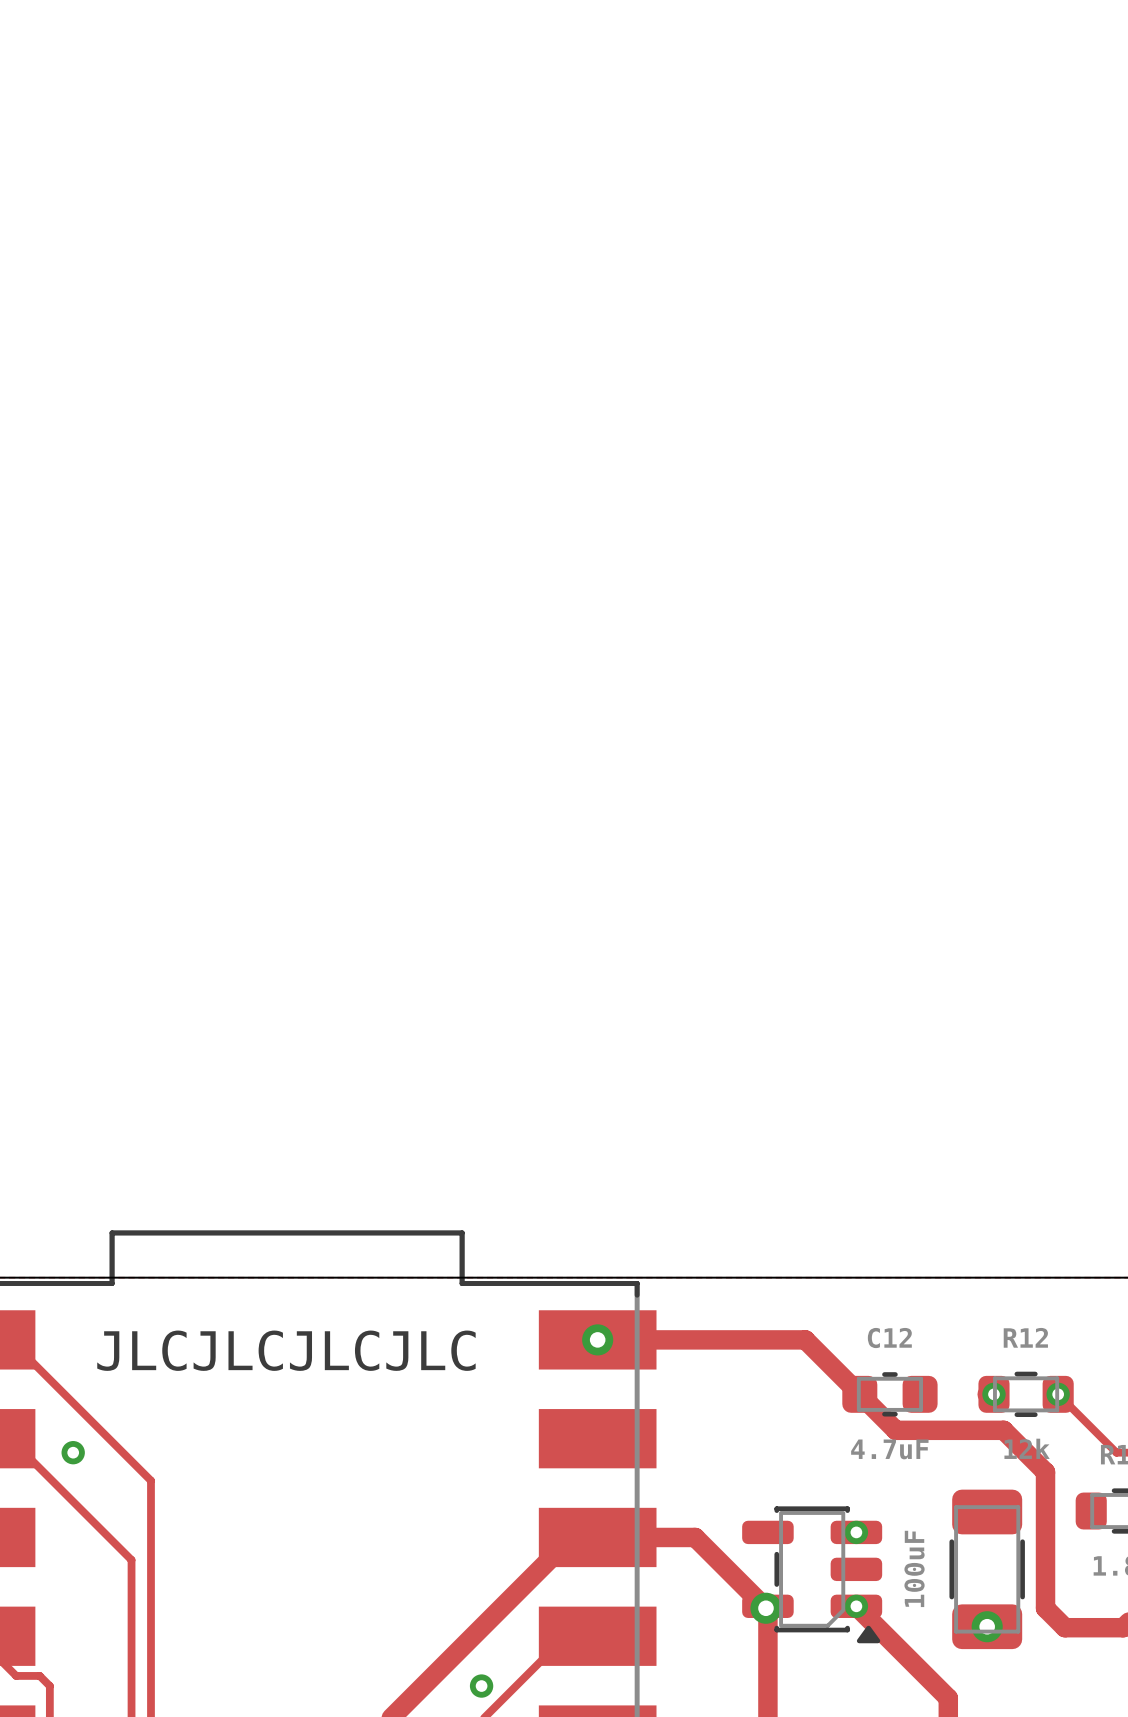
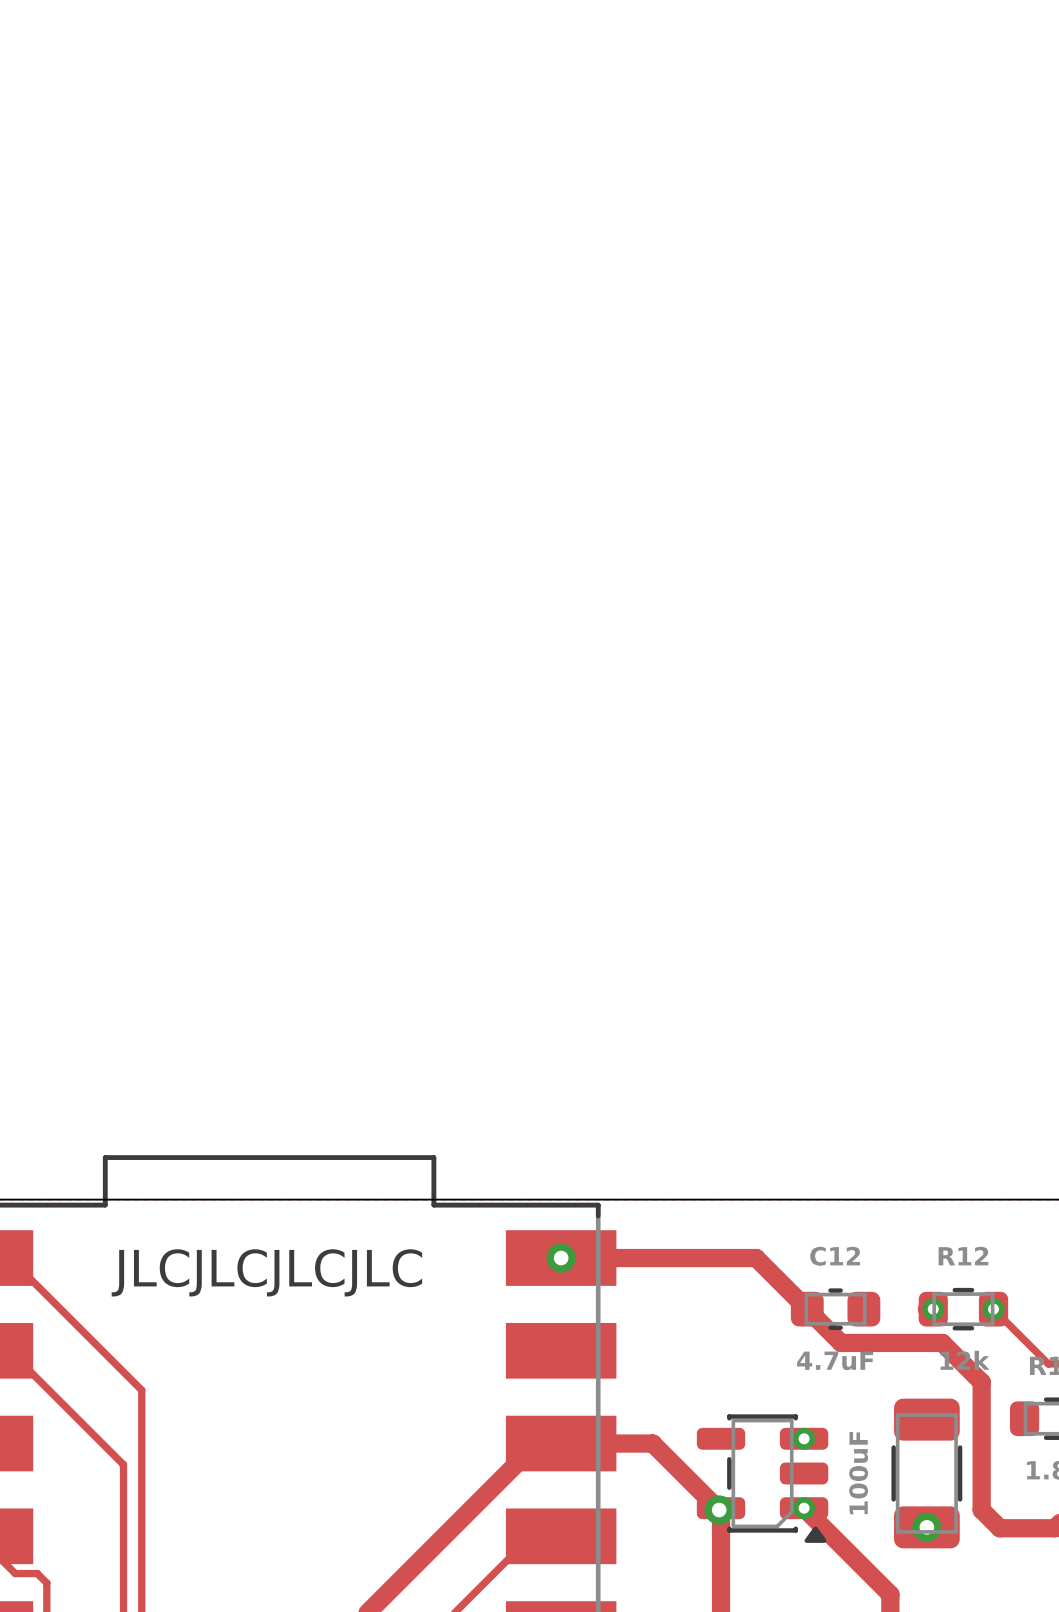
via: (73, 1452) -> none
via: (481, 1686) -> none

